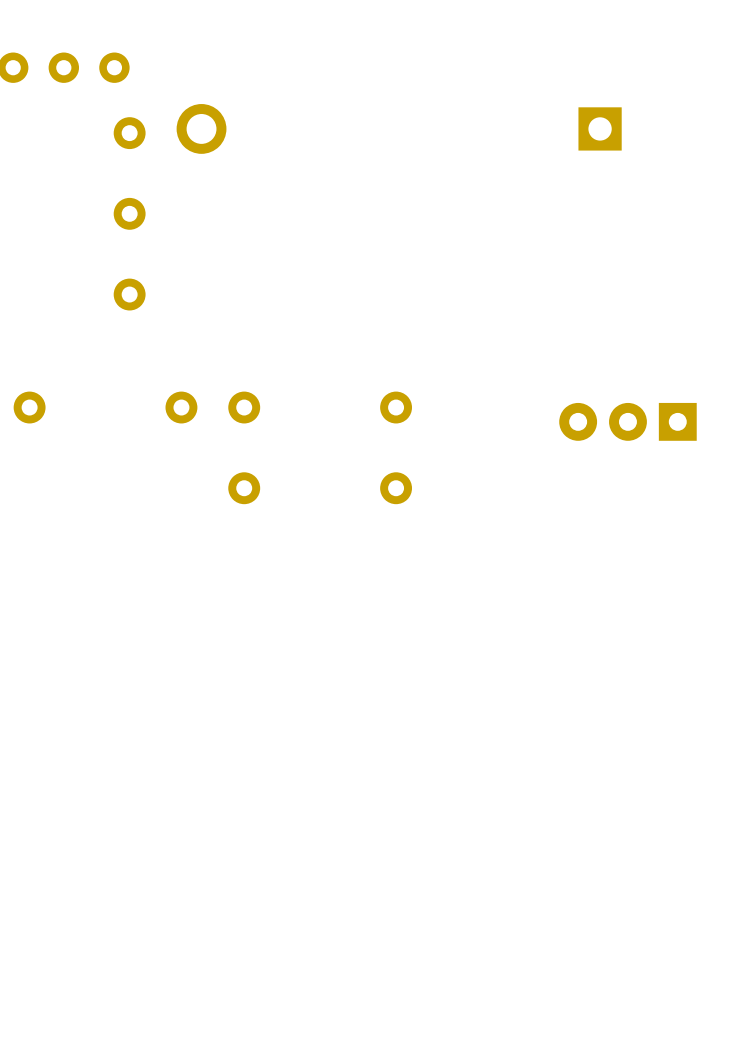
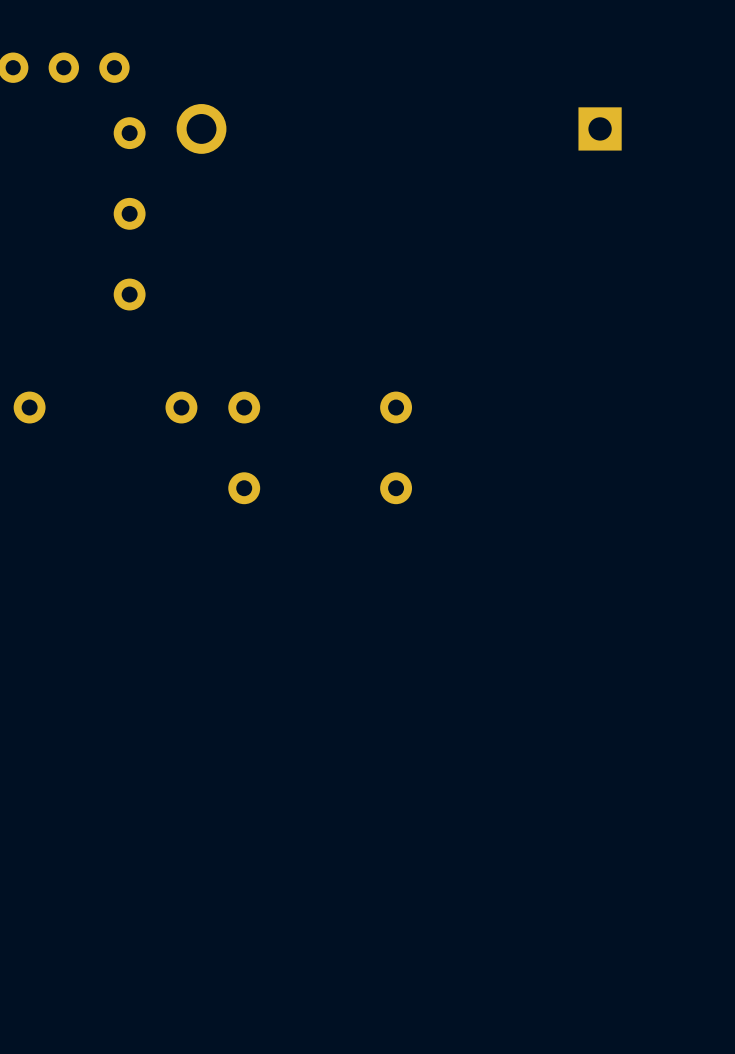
part: (627, 421) -> none

